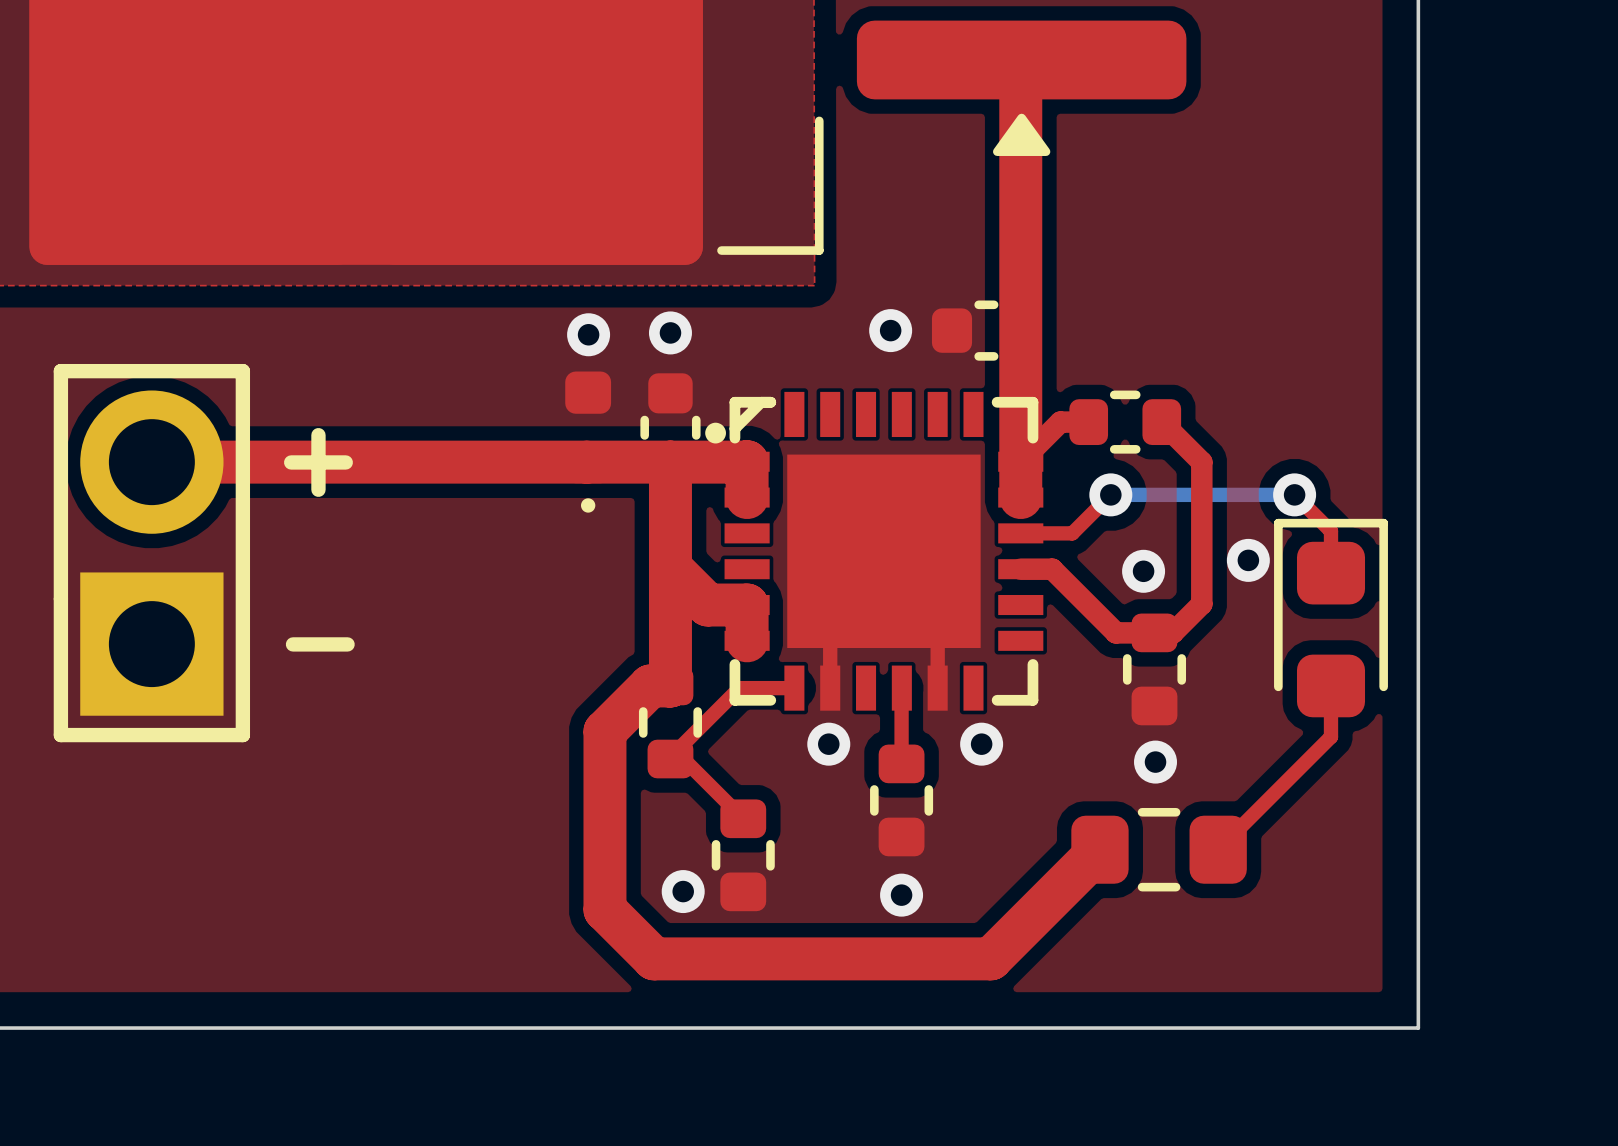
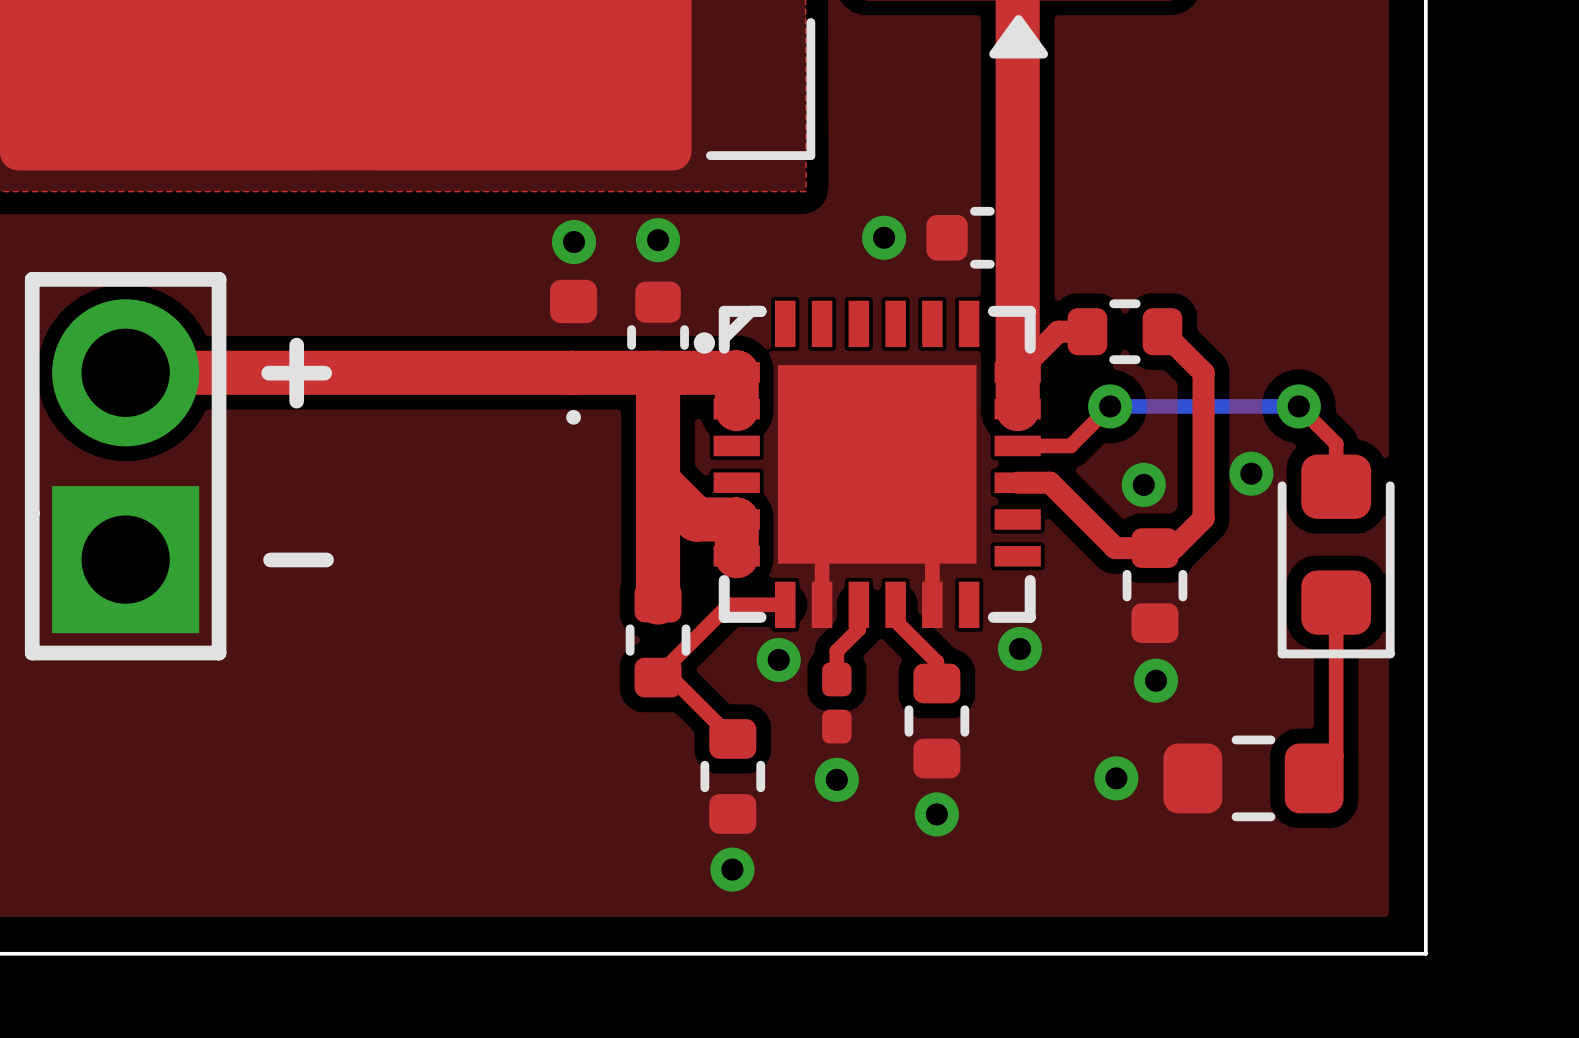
part rotation: 0° (1331, 618) -> 180° (1336, 556)
top track: (670, 685) (650, 685) (604, 731) (604, 909) (654, 958) (990, 958) (1099, 849) -> none
top track: none -> (858, 604) (858, 629) (836, 651) (836, 679)
top track: (901, 688) (901, 763) -> (895, 604) (895, 620) (936, 662) (936, 683)
top track: (1331, 736) (1218, 849) -> (1336, 654) (1336, 756) (1314, 778)
via position: (828, 744) -> (778, 659)
via position: (981, 744) -> (1019, 648)
part: none -> (836, 703)
part position: (901, 800) -> (936, 721)
part position: (1159, 849) -> (1253, 778)
via: none -> (1116, 778)
via: none -> (836, 779)
via position: (683, 891) -> (732, 869)
via position: (901, 895) -> (936, 814)

